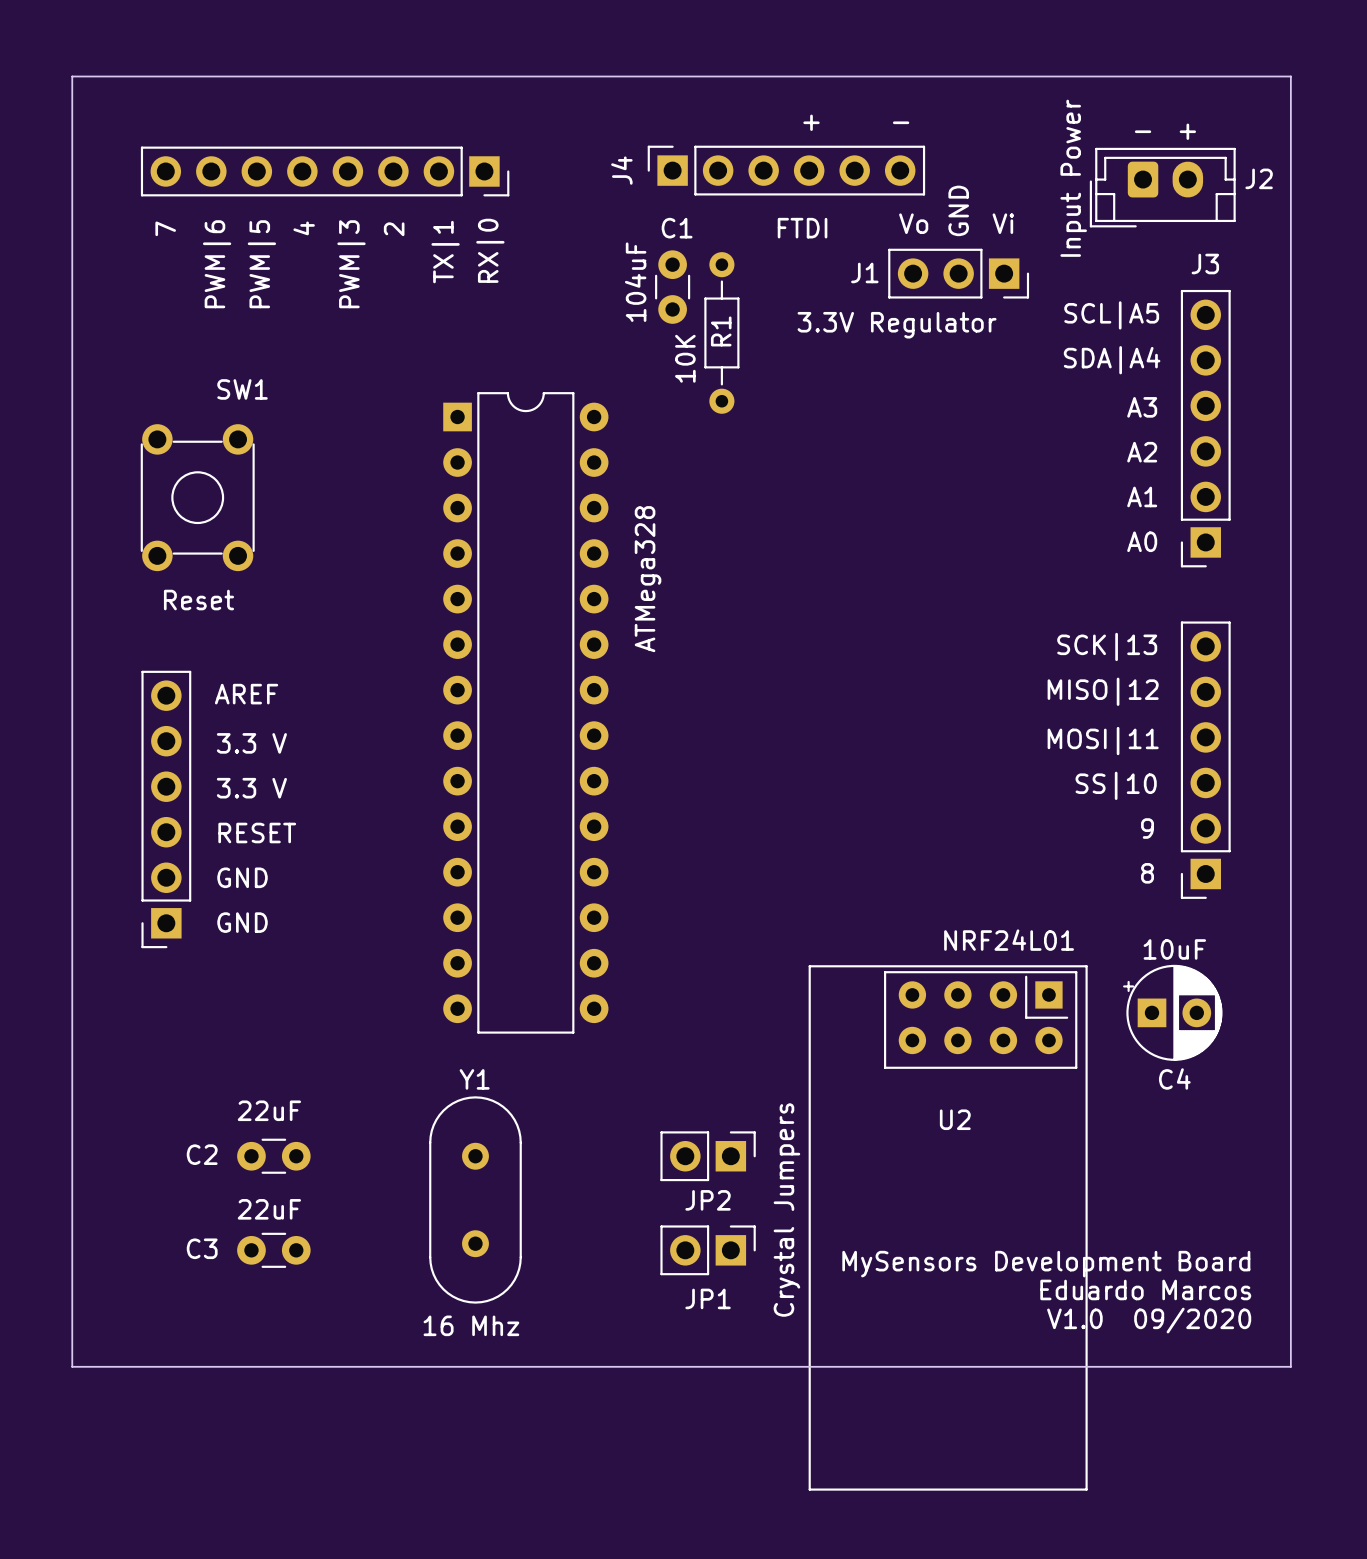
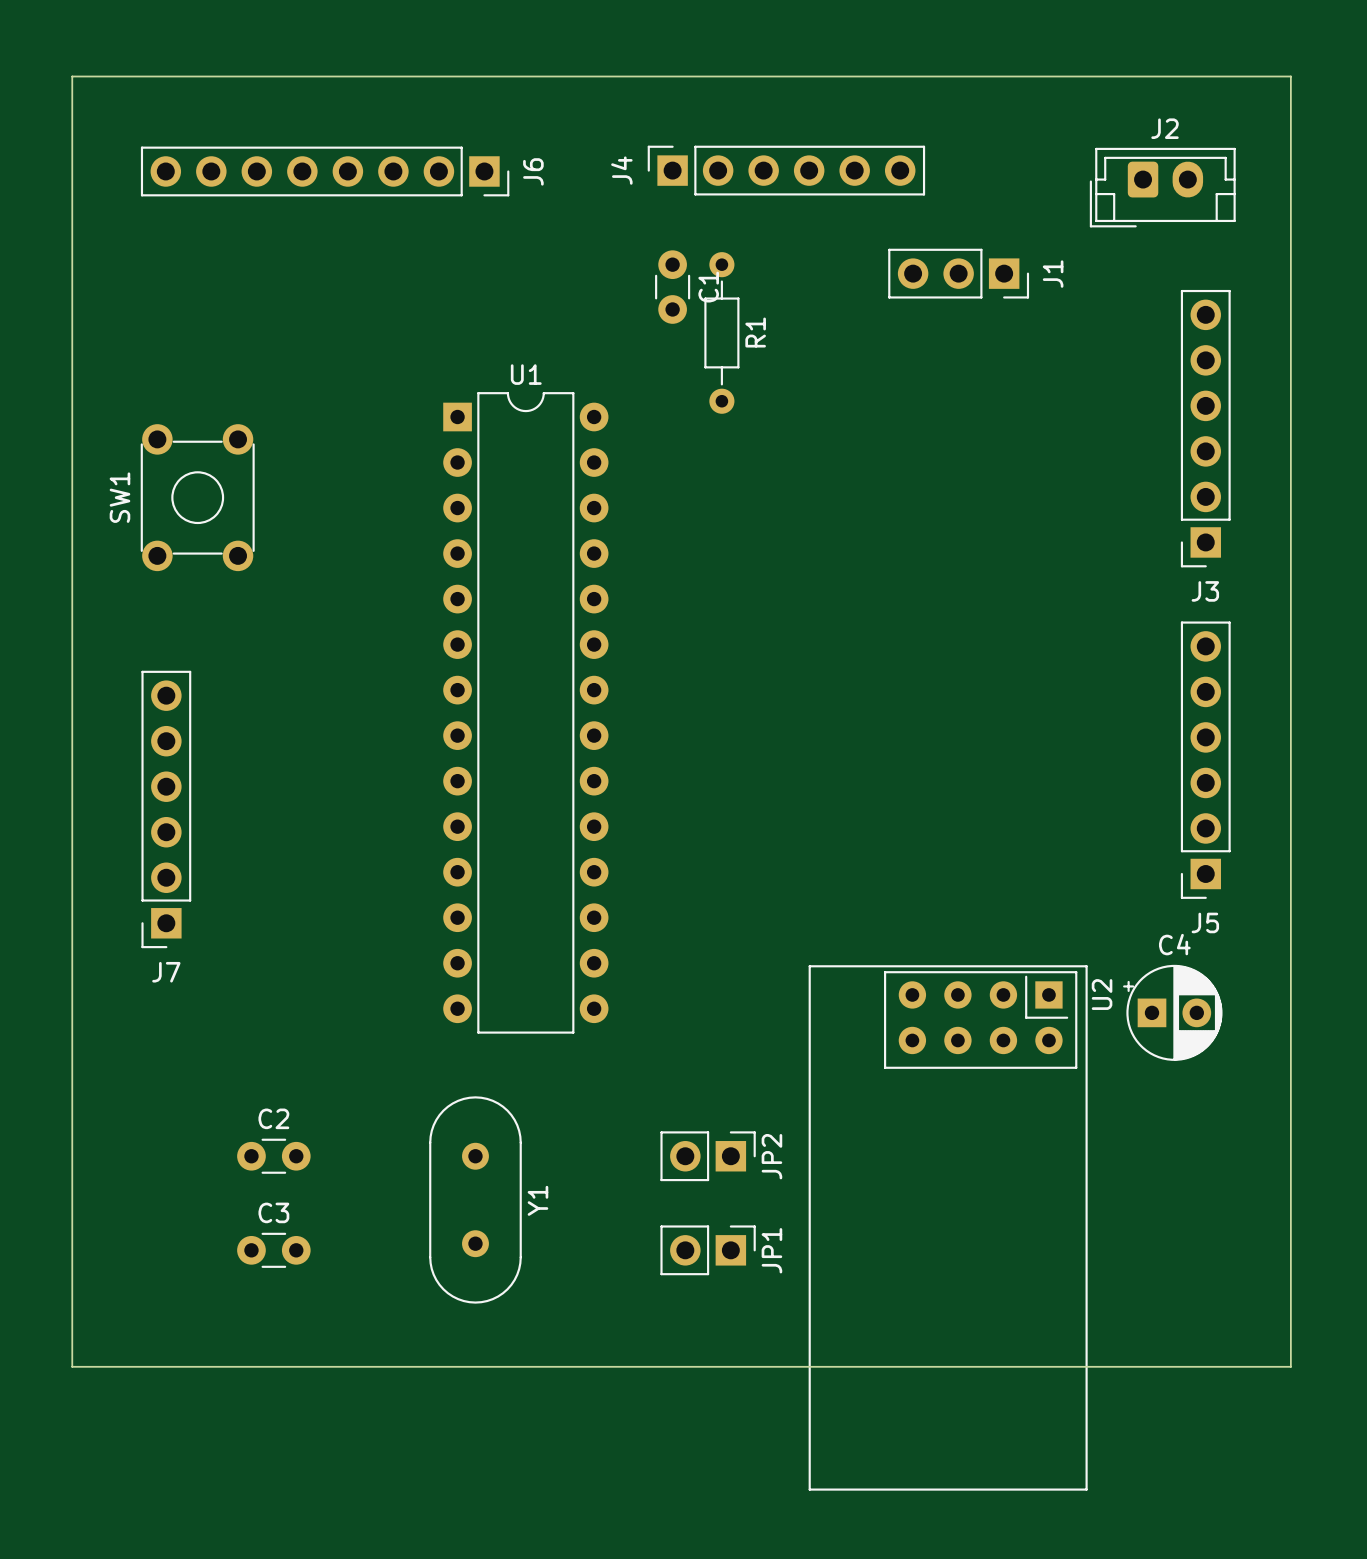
text: + (811, 122) -> none
text: - (901, 122) -> none
text: - (1143, 131) -> none
text: + (1187, 131) -> none
J6 name: none -> J6 (533, 171)
text: Input Power (1073, 178) -> none
J2 name position: J2 (1259, 178) -> J2 (1165, 128)
text: GND (958, 210) -> none
text: Vo (913, 223) -> none
text: Vi (1003, 223) -> none
text: 7 (165, 228) -> none
text: 4 (304, 228) -> none
C1 name rotation: 0° (677, 228) -> 90° counterclockwise (708, 287)
C1 name position: C1 (677, 228) -> C1 (708, 287)
J4 value: FTDI (802, 228) -> none
text: 2 (394, 229) -> none
text: RX|0 (490, 250) -> none
text: TX|1 (445, 252) -> none
text: PWM|6 (217, 264) -> none
text: PWM|5 (261, 264) -> none
text: PWM|3 (351, 264) -> none
J3 name position: J3 (1205, 264) -> J3 (1205, 591)
J1 name rotation: 0° (864, 272) -> 90° counterclockwise (1053, 274)
J1 name position: J1 (864, 272) -> J1 (1053, 274)
text: 104uF (635, 282) -> none
text: SCL|A5 (1111, 315) -> none
J1 value: 3.3V Regulator (897, 325) -> none
R1 name position: R1 (721, 331) -> R1 (755, 332)
text: 10K (685, 358) -> none
text: SDA|A4 (1112, 360) -> none
SW1 name rotation: 0° (242, 389) -> 90° counterclockwise (119, 497)
SW1 name position: SW1 (242, 389) -> SW1 (119, 497)
text: A3 (1142, 407) -> none
text: A2 (1142, 452) -> none
text: A1 (1142, 496) -> none
text: A0 (1142, 541) -> none
ATMega328 name: ATMega328 (648, 579) -> U1 (526, 374)
text: Reset (198, 600) -> none
text: SCK|13 (1107, 646) -> none
text: MISO|12 (1103, 691) -> none
text: AREF (246, 694) -> none
text: MOSI|11 (1103, 741) -> none
text: 3.3 V (251, 743) -> none
text: SS|10 (1116, 785) -> none
text: 3.3 V (251, 788) -> none
text: 9 (1147, 828) -> none
text: RESET (257, 832) -> none
text: 8 (1147, 873) -> none
text: GND (242, 877) -> none
text: GND (242, 922) -> none
J5 name: none -> J5 (1205, 922)
text: NRF24L01 (1009, 940) -> none
text: 10uF (1174, 949) -> none
J7 name: none -> J7 (166, 972)
C4 name position: C4 (1174, 1078) -> C4 (1174, 944)
Y1 name rotation: 0° (474, 1079) -> 90° counterclockwise (537, 1200)
Y1 name position: Y1 (474, 1079) -> Y1 (537, 1200)
text: 22uF (269, 1110) -> none
U2 name rotation: 0° (955, 1119) -> 90° counterclockwise (1102, 994)
U2 name position: U2 (955, 1119) -> U2 (1102, 994)
C2 name position: C2 (202, 1154) -> C2 (273, 1118)
JP2 name rotation: 0° (708, 1200) -> 90° counterclockwise (771, 1156)
JP2 name position: JP2 (708, 1200) -> JP2 (771, 1156)
text: 22uF (269, 1209) -> none
text: Crystal Jumpers (786, 1210) -> none
C3 name position: C3 (202, 1248) -> C3 (273, 1212)
text: MySensors Development Board (1046, 1264) -> none
text: Eduardo Marcos (1145, 1289) -> none
JP1 name rotation: 0° (708, 1298) -> 90° counterclockwise (771, 1250)
JP1 name position: JP1 (708, 1298) -> JP1 (771, 1250)
text: V1.0 09/2020 (1149, 1320) -> none
text: 16 Mhz (471, 1325) -> none

